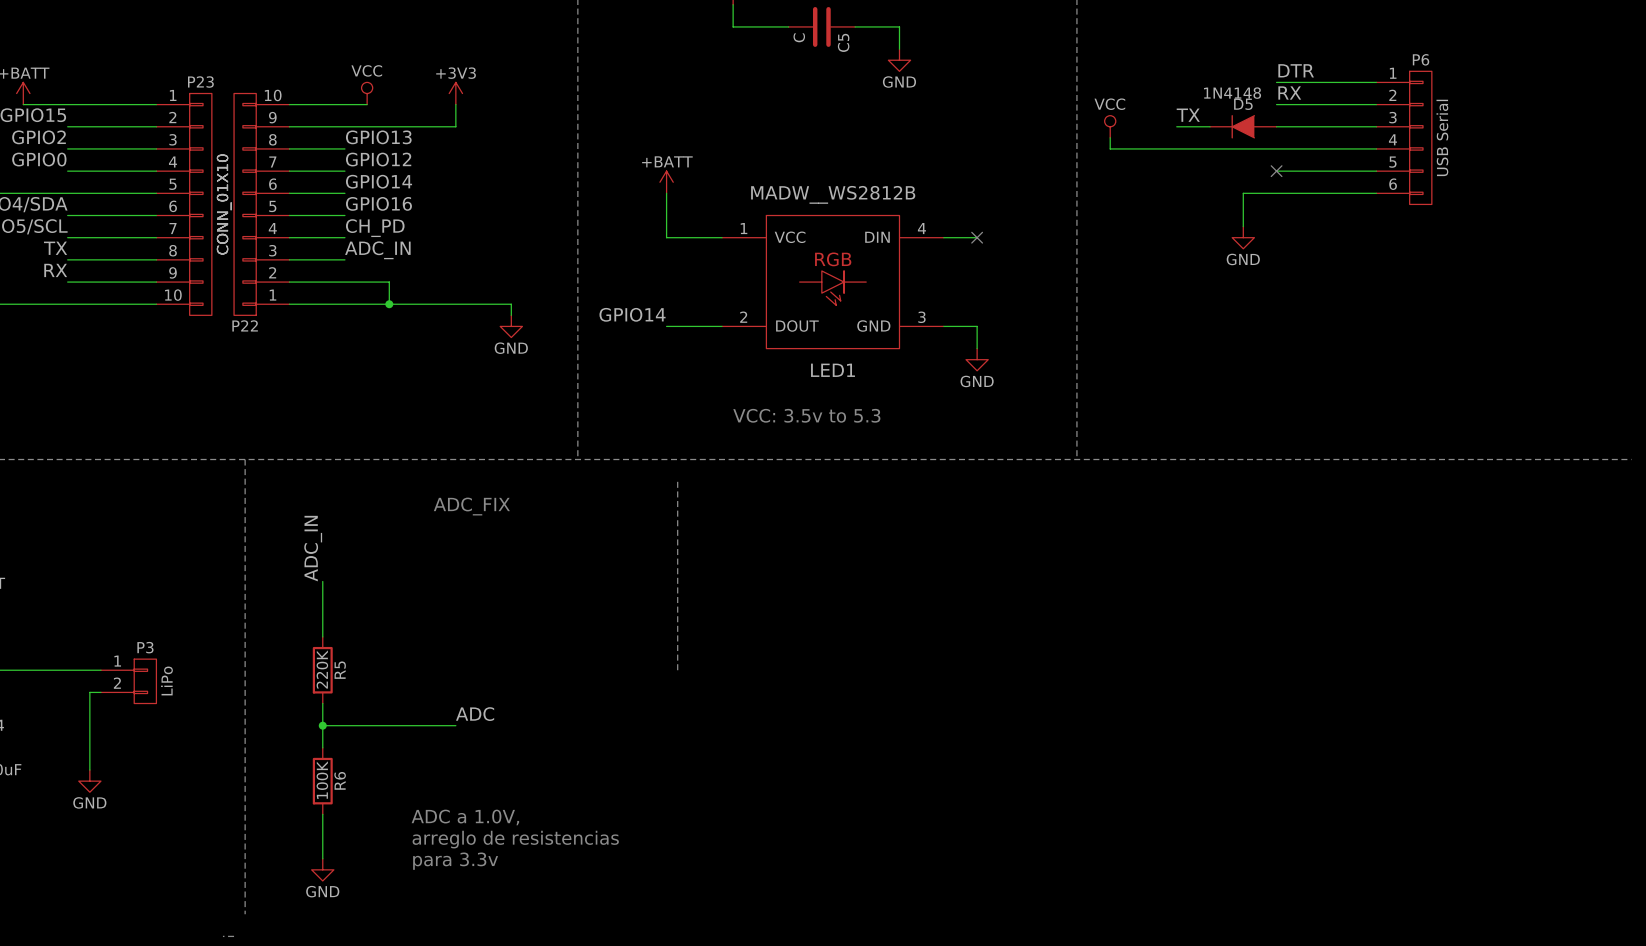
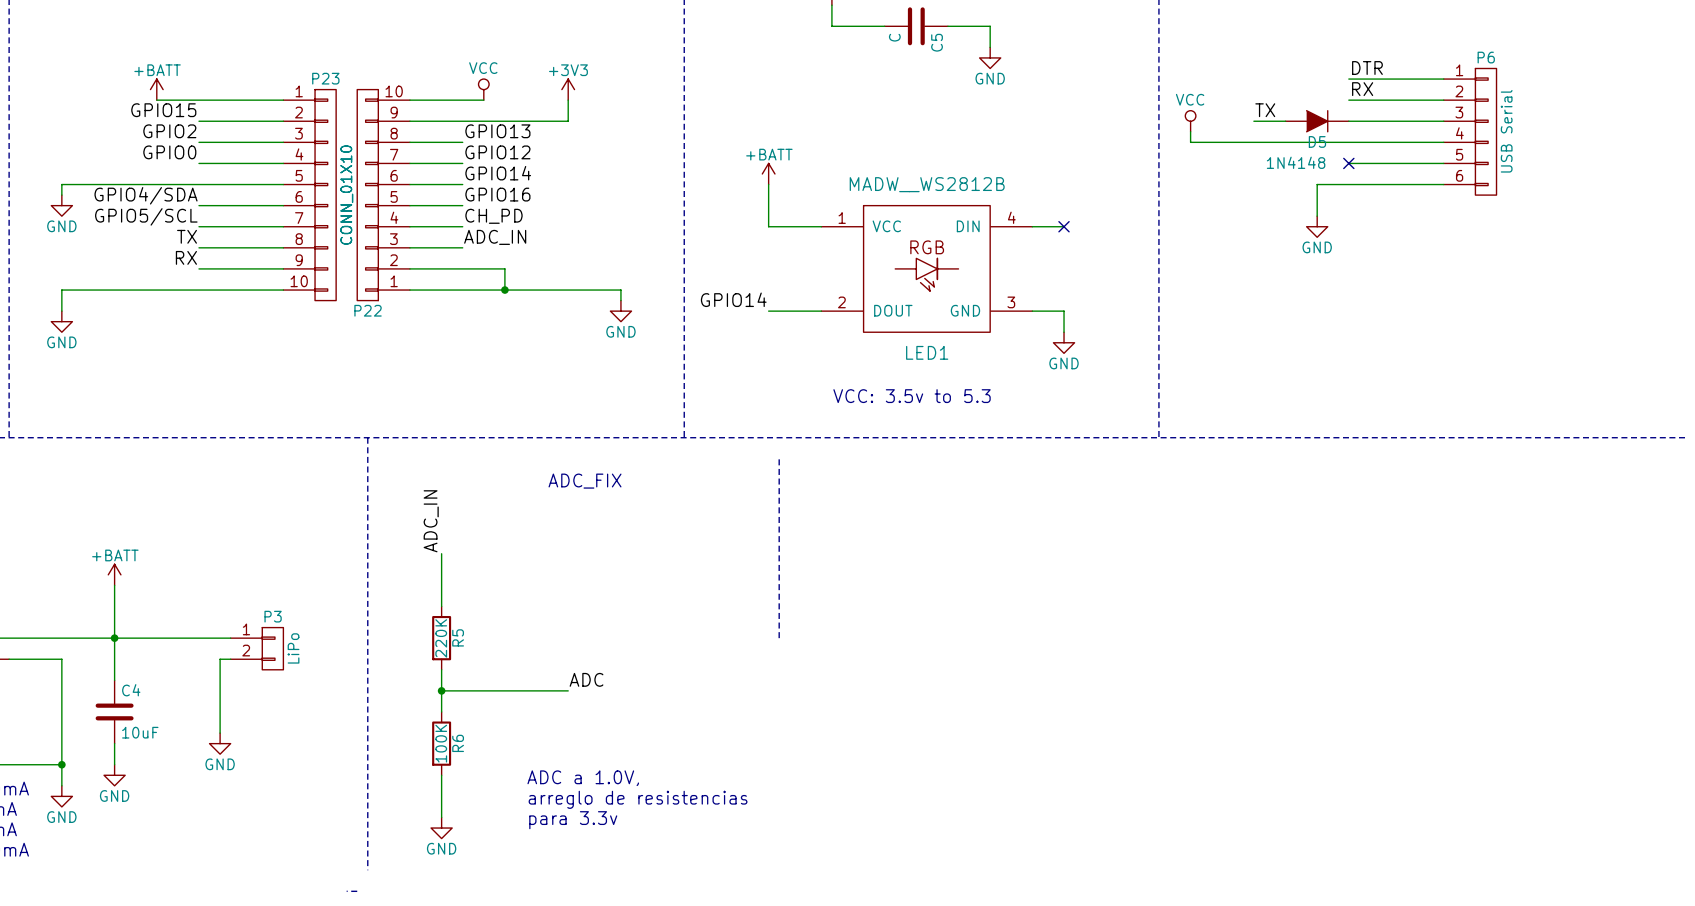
D5 value position: 1N4148 (1232, 93) -> 1N4148 (1296, 162)
D5 rotation: 0° (1242, 126) -> 180° (1317, 121)

